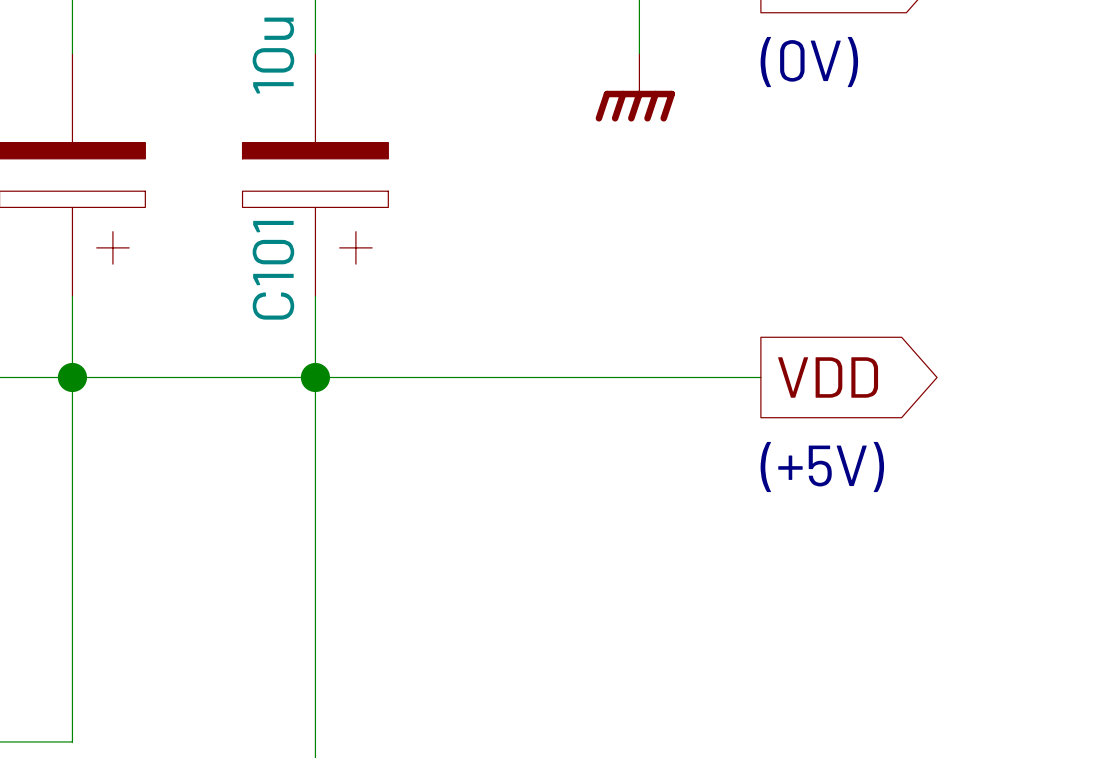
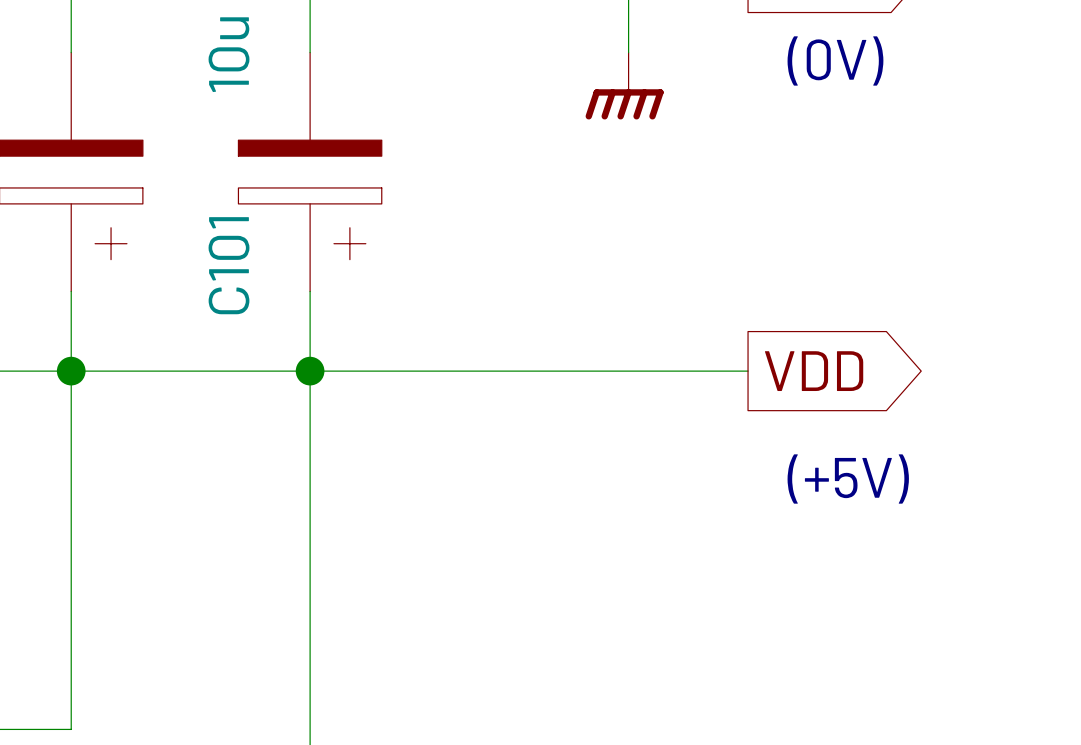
C101 value position: 10u (273, 55) -> 10u (229, 54)
text position: (0V) (809, 62) -> (0V) (835, 60)
C101 name position: C101 (273, 270) -> C101 (229, 265)
text position: (+5V) (822, 467) -> (+5V) (848, 479)

